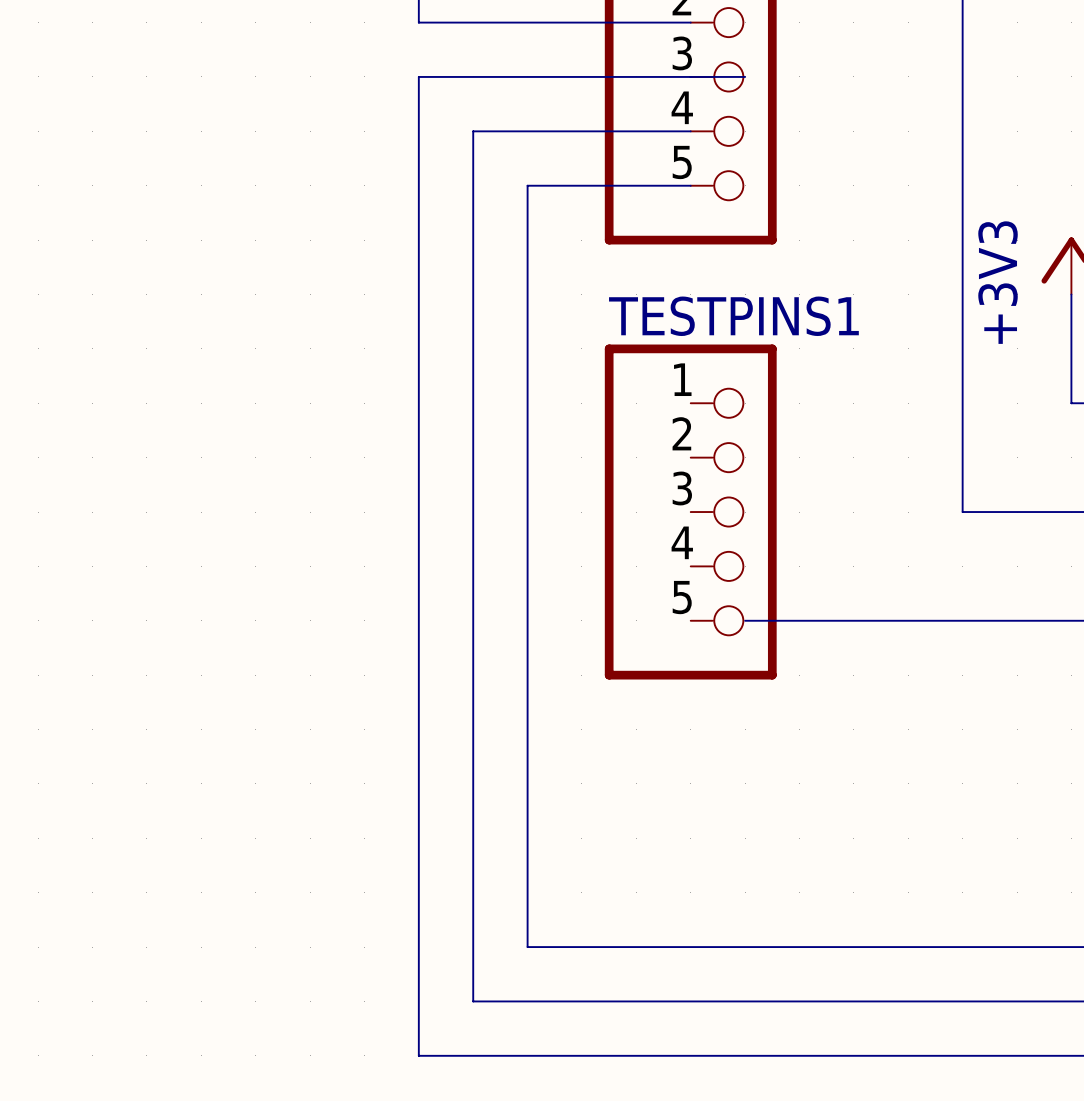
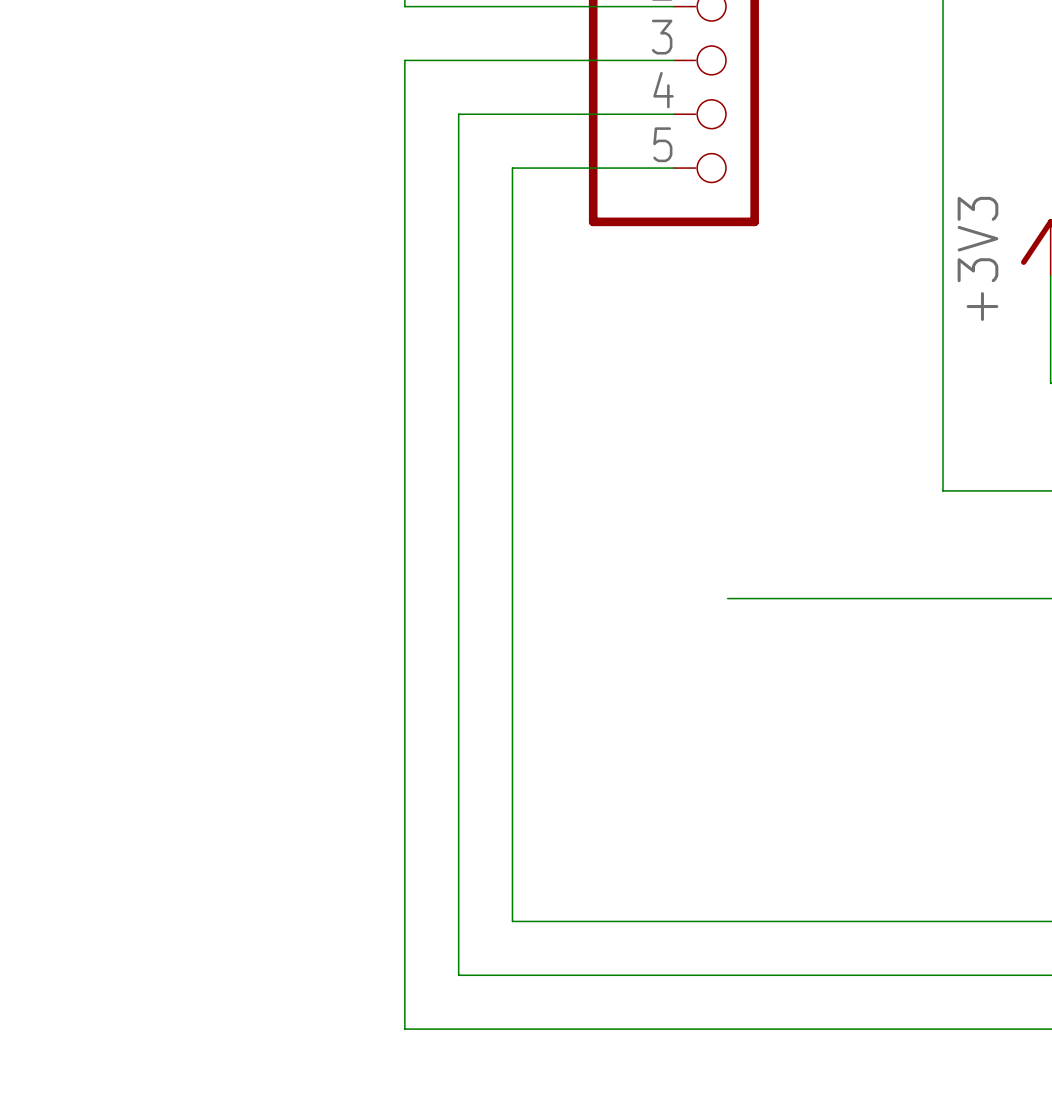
wire: (690, 76) (745, 76) -> none
TESTPINS1: (690, 512) -> none

